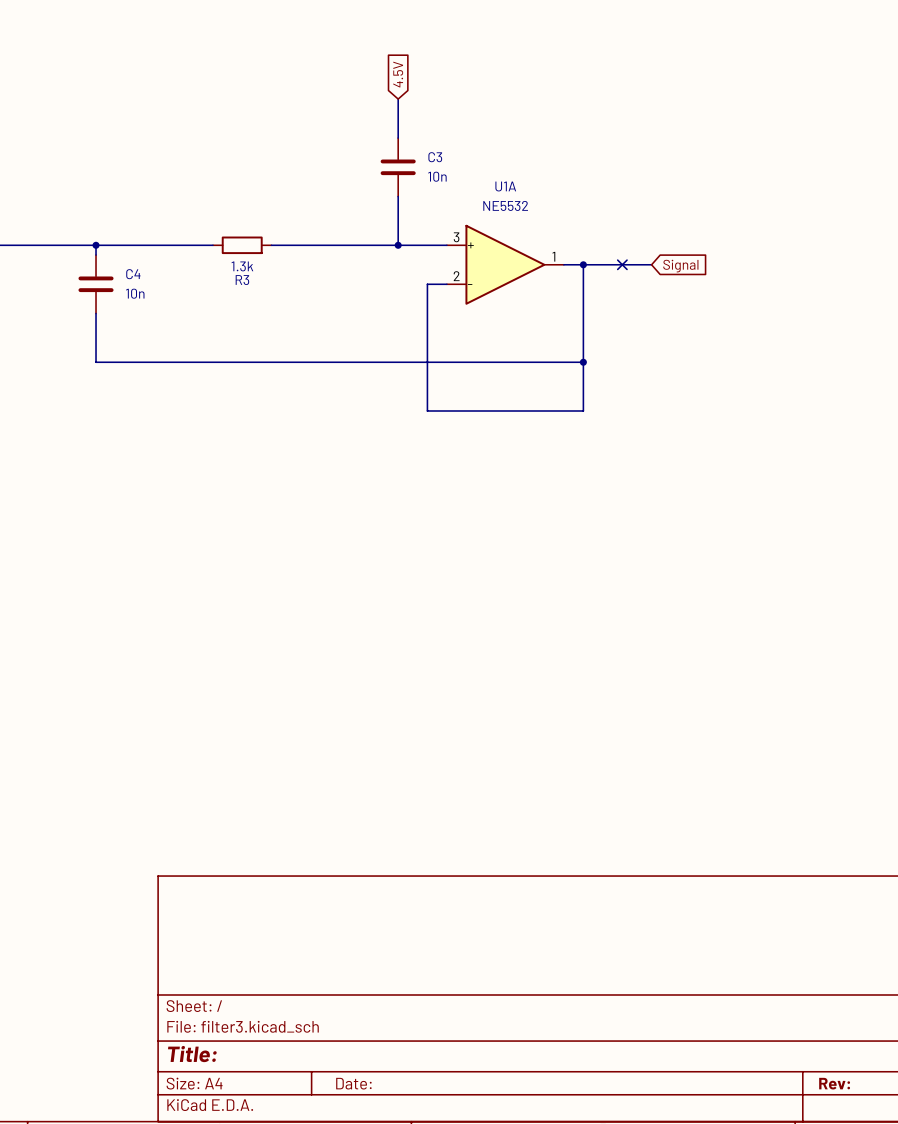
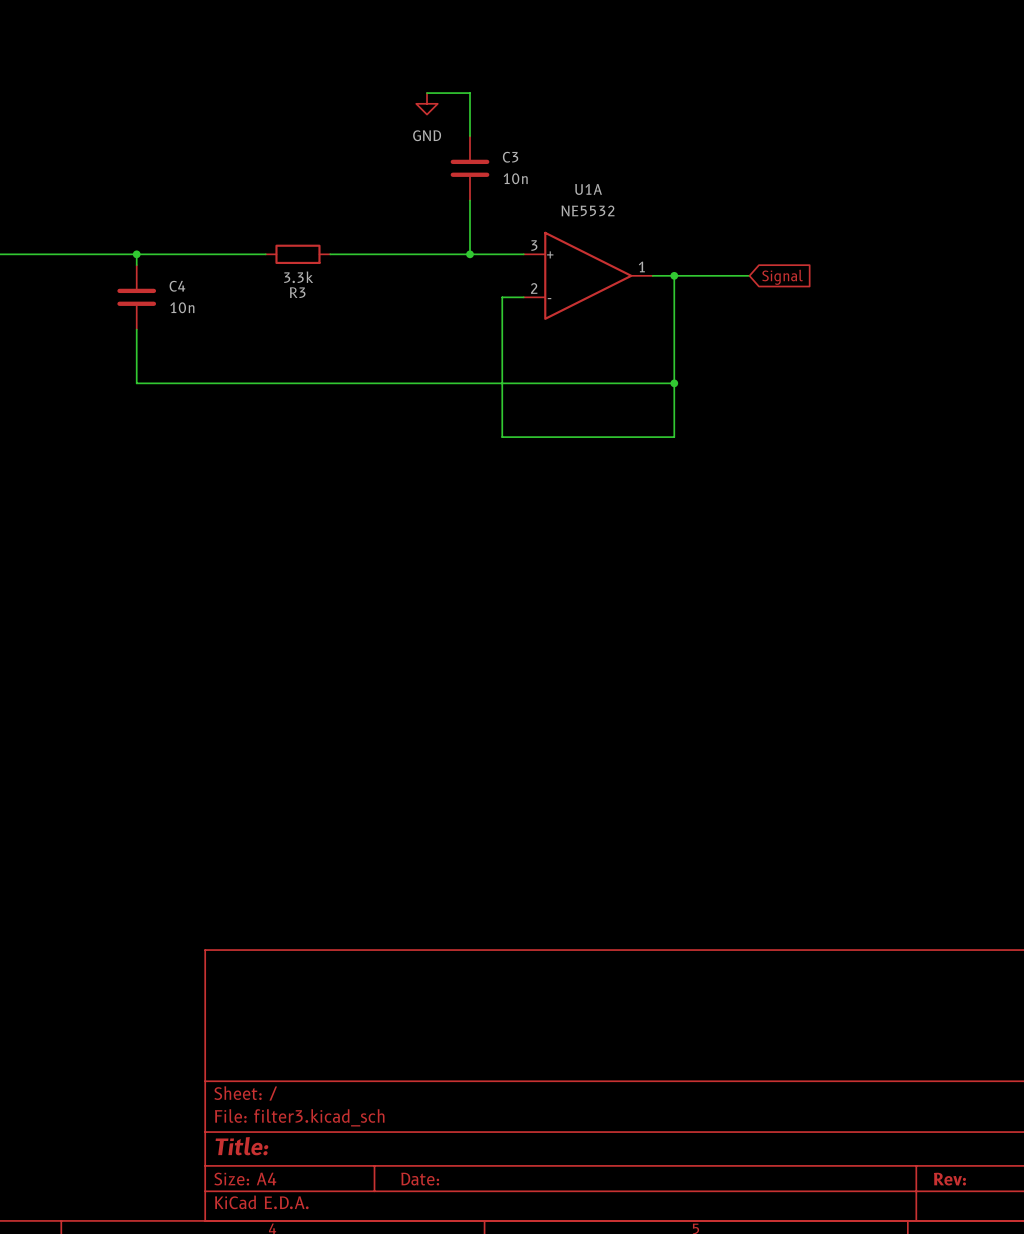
global label: 4.5V (398, 74) -> none
wire: none -> (427, 93) (470, 93)
power symbol: none -> GND (427, 103)
no-connect mark: (622, 264) -> none
R3 value: 1.3k (242, 266) -> 3.3k (298, 277)

